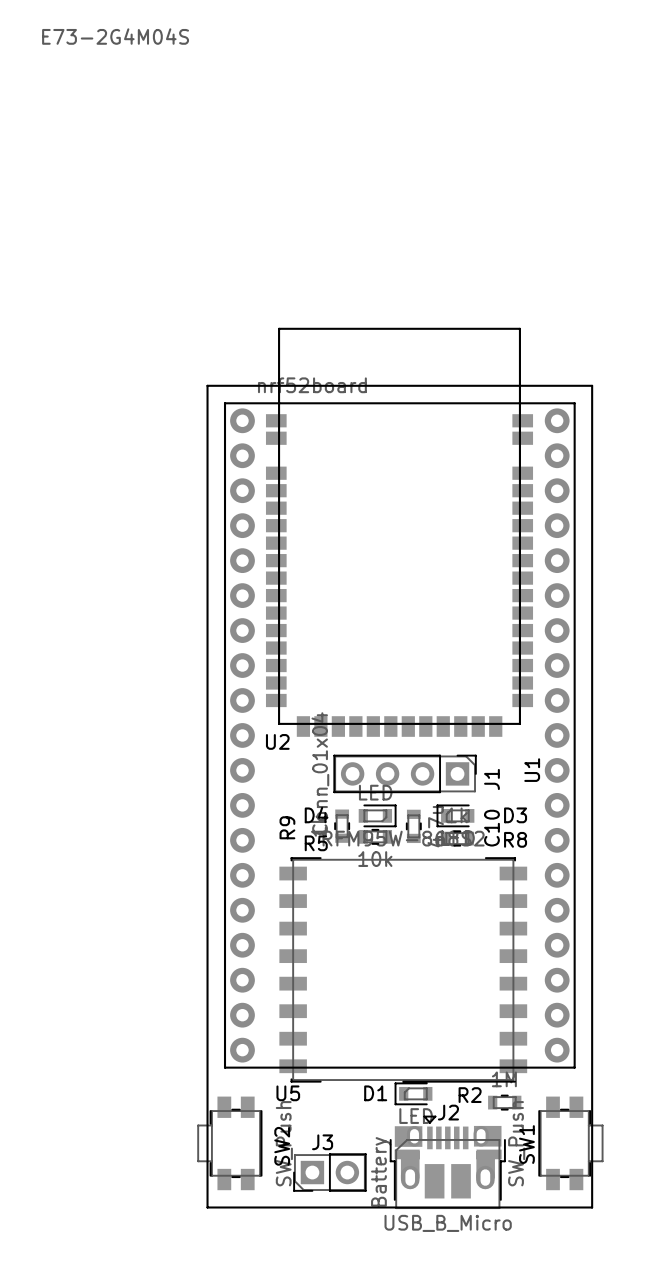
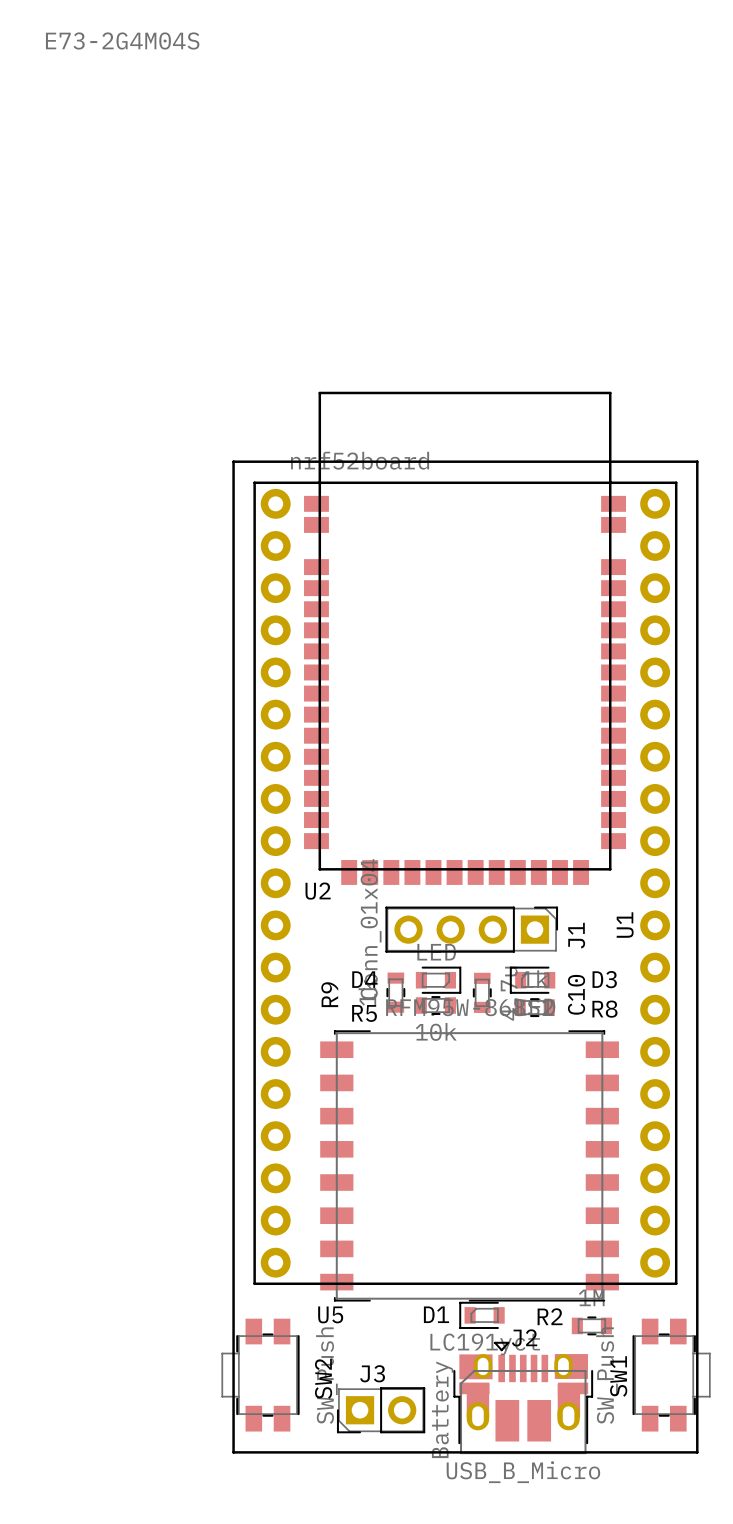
D1 value: LED (416, 1116) -> LC191yct (485, 1344)

